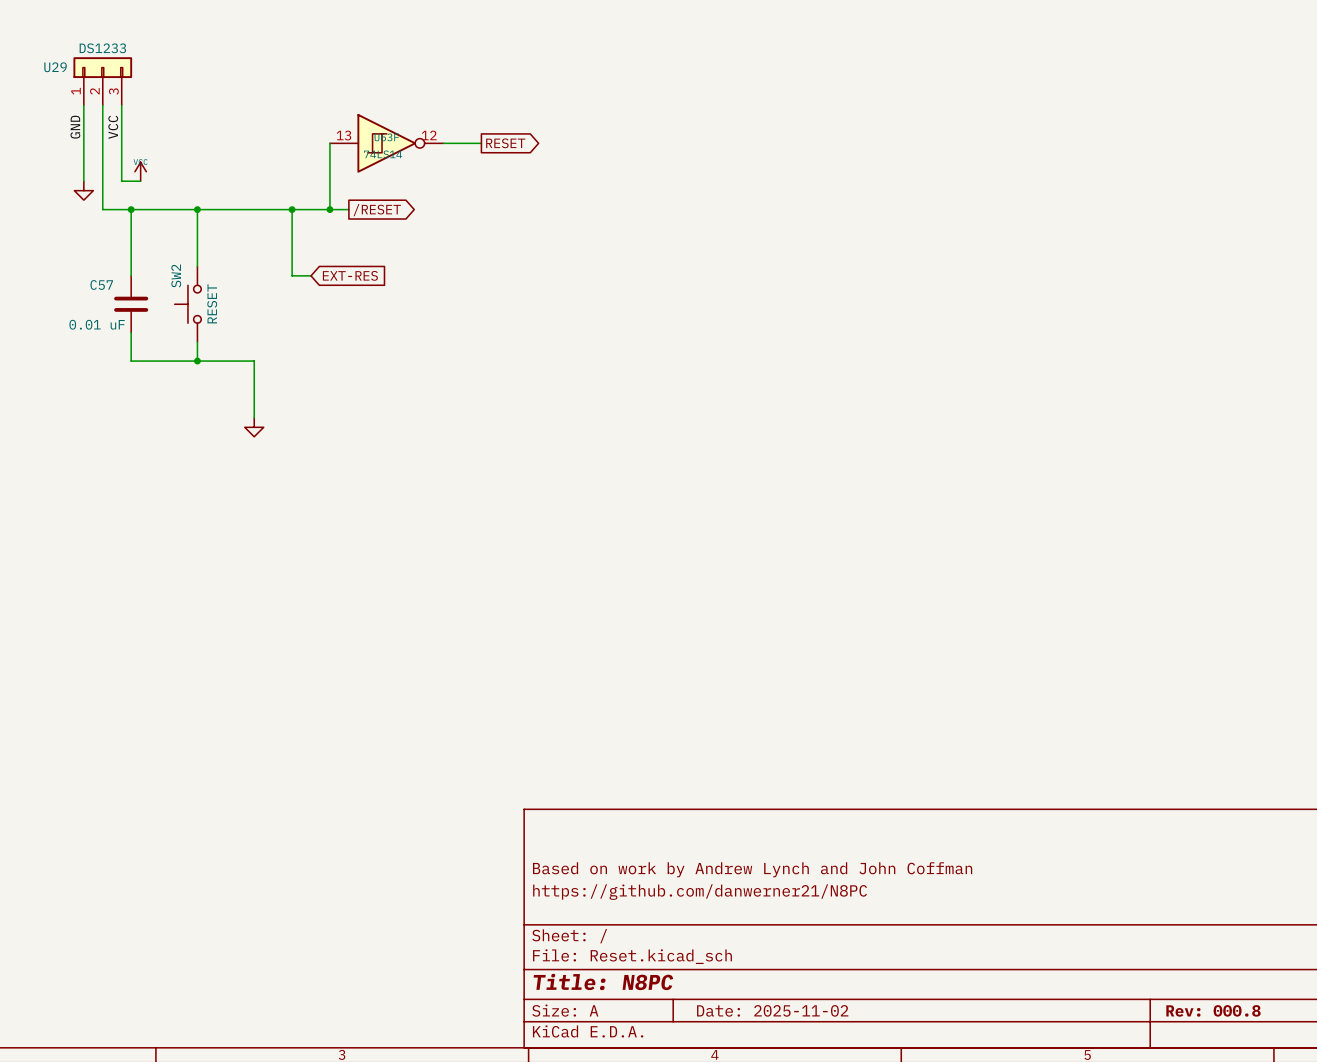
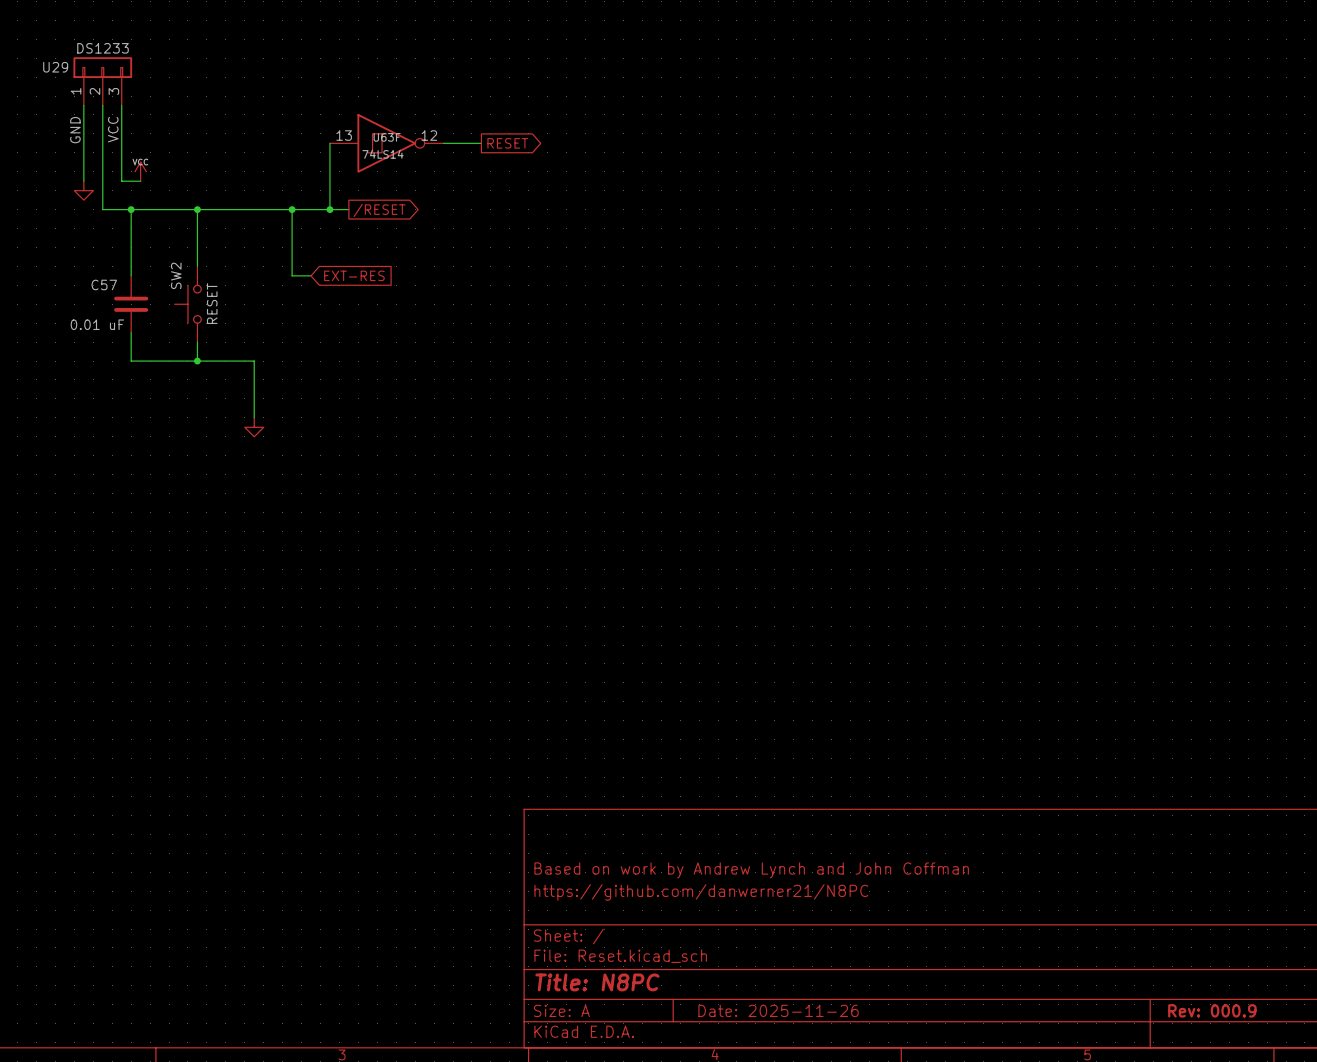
title block: Date: 2025-11-02 (772, 1010) -> Date: 2025-11-26 (778, 1010)
title block: Rev: 000.8 (1213, 1010) -> Rev: 000.9 (1212, 1010)

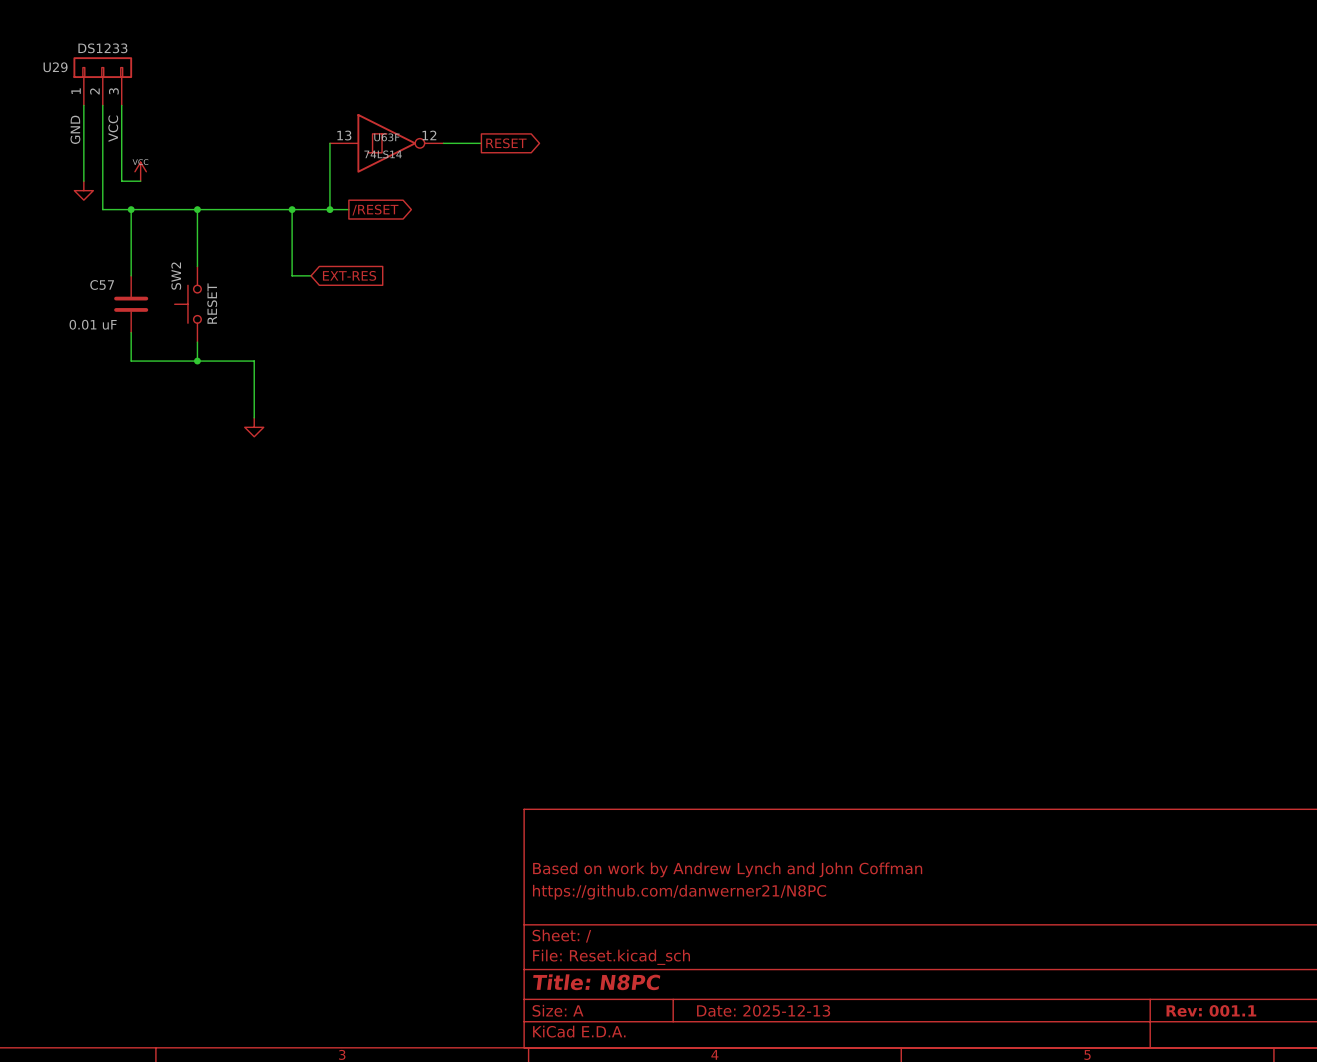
title block: Date: 2025-11-26 (778, 1010) -> Date: 2025-12-13 (763, 1010)
title block: Rev: 000.9 (1212, 1010) -> Rev: 001.1 (1211, 1010)

